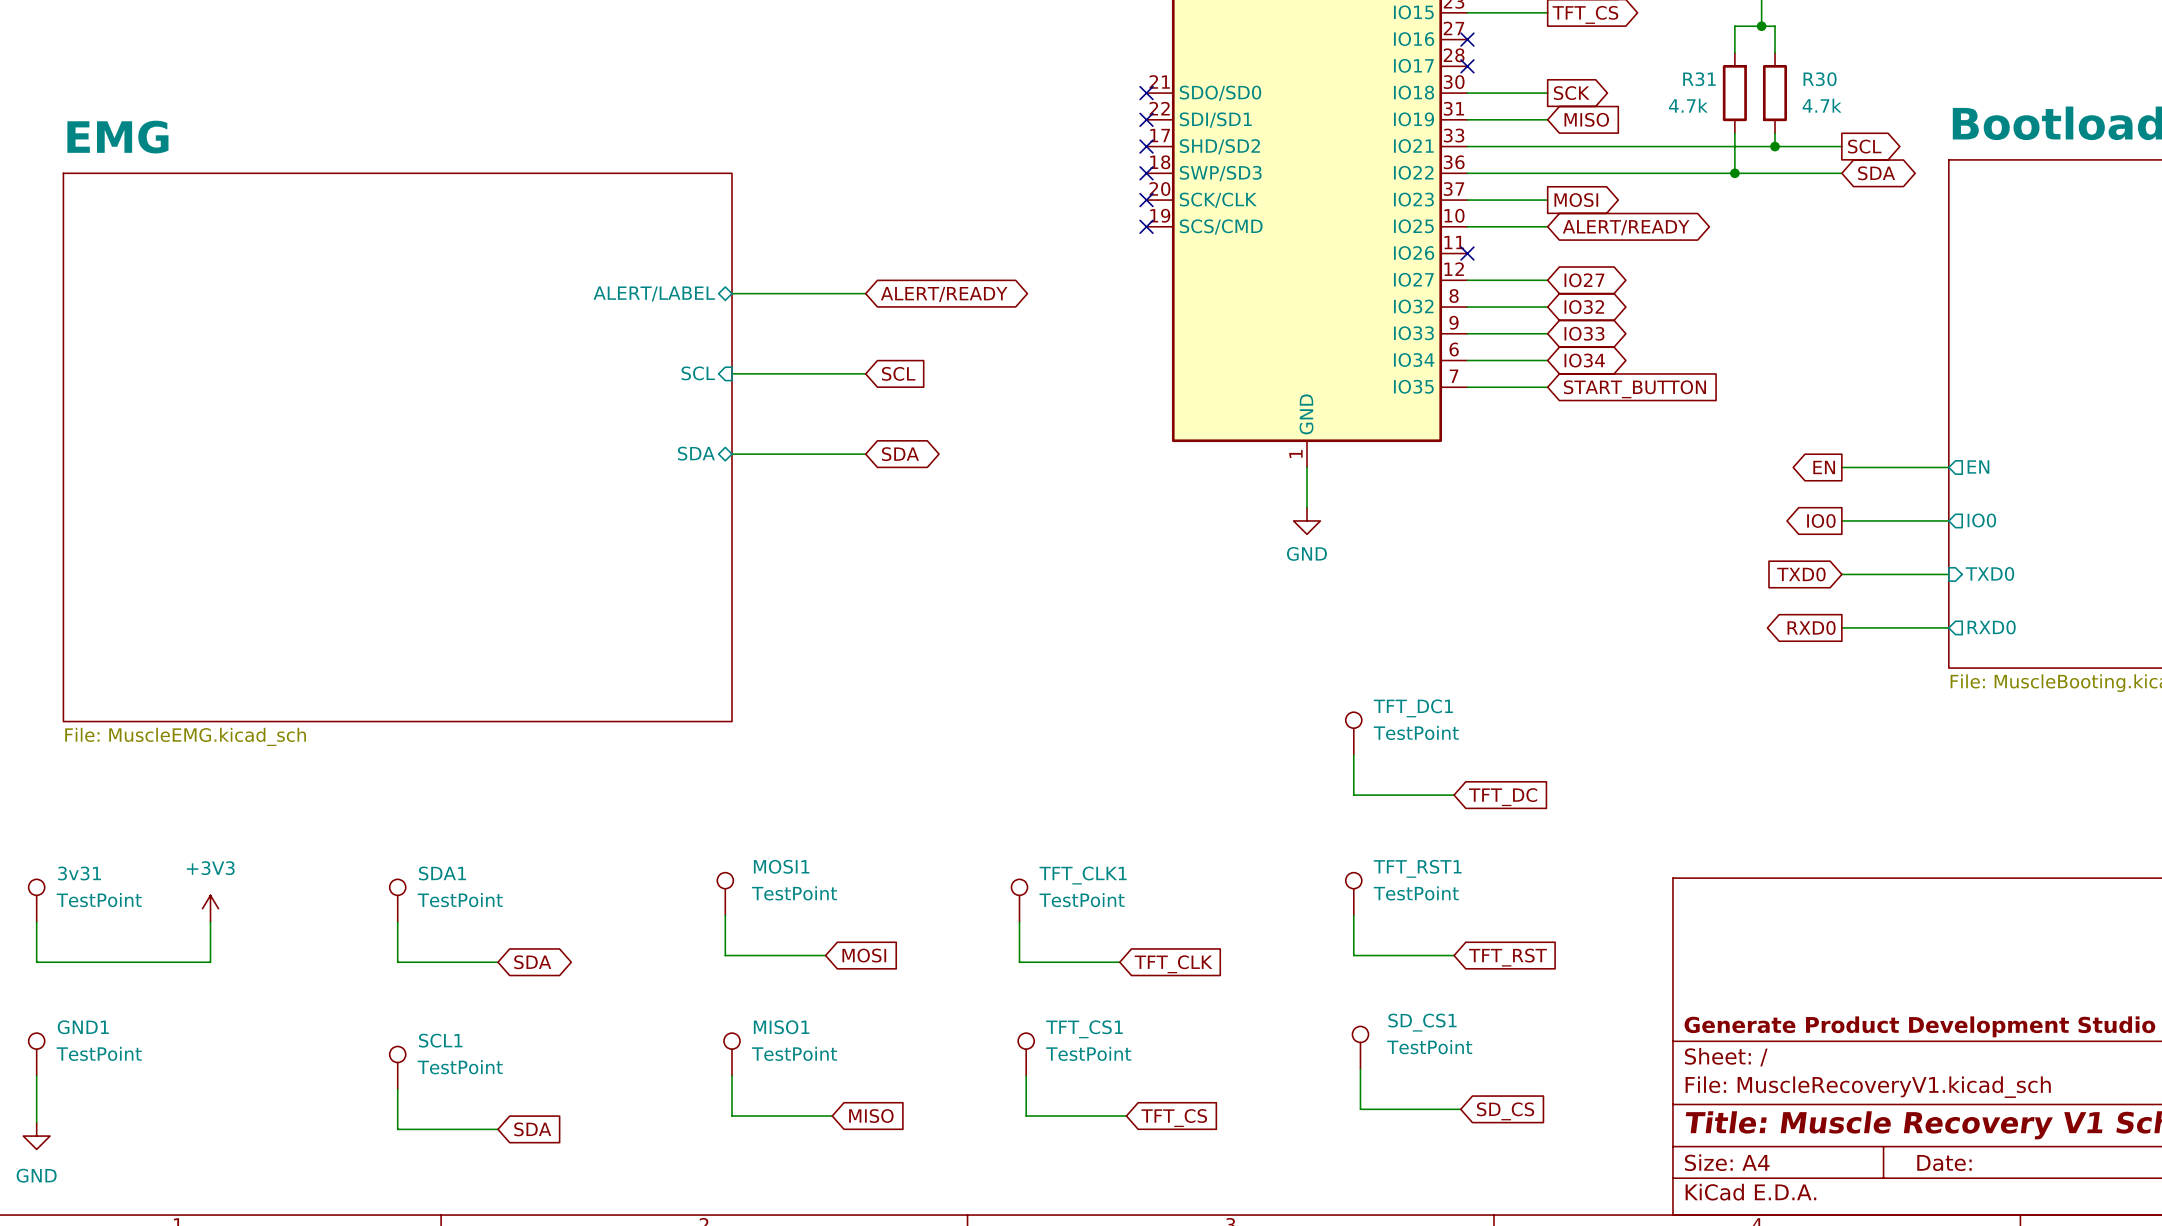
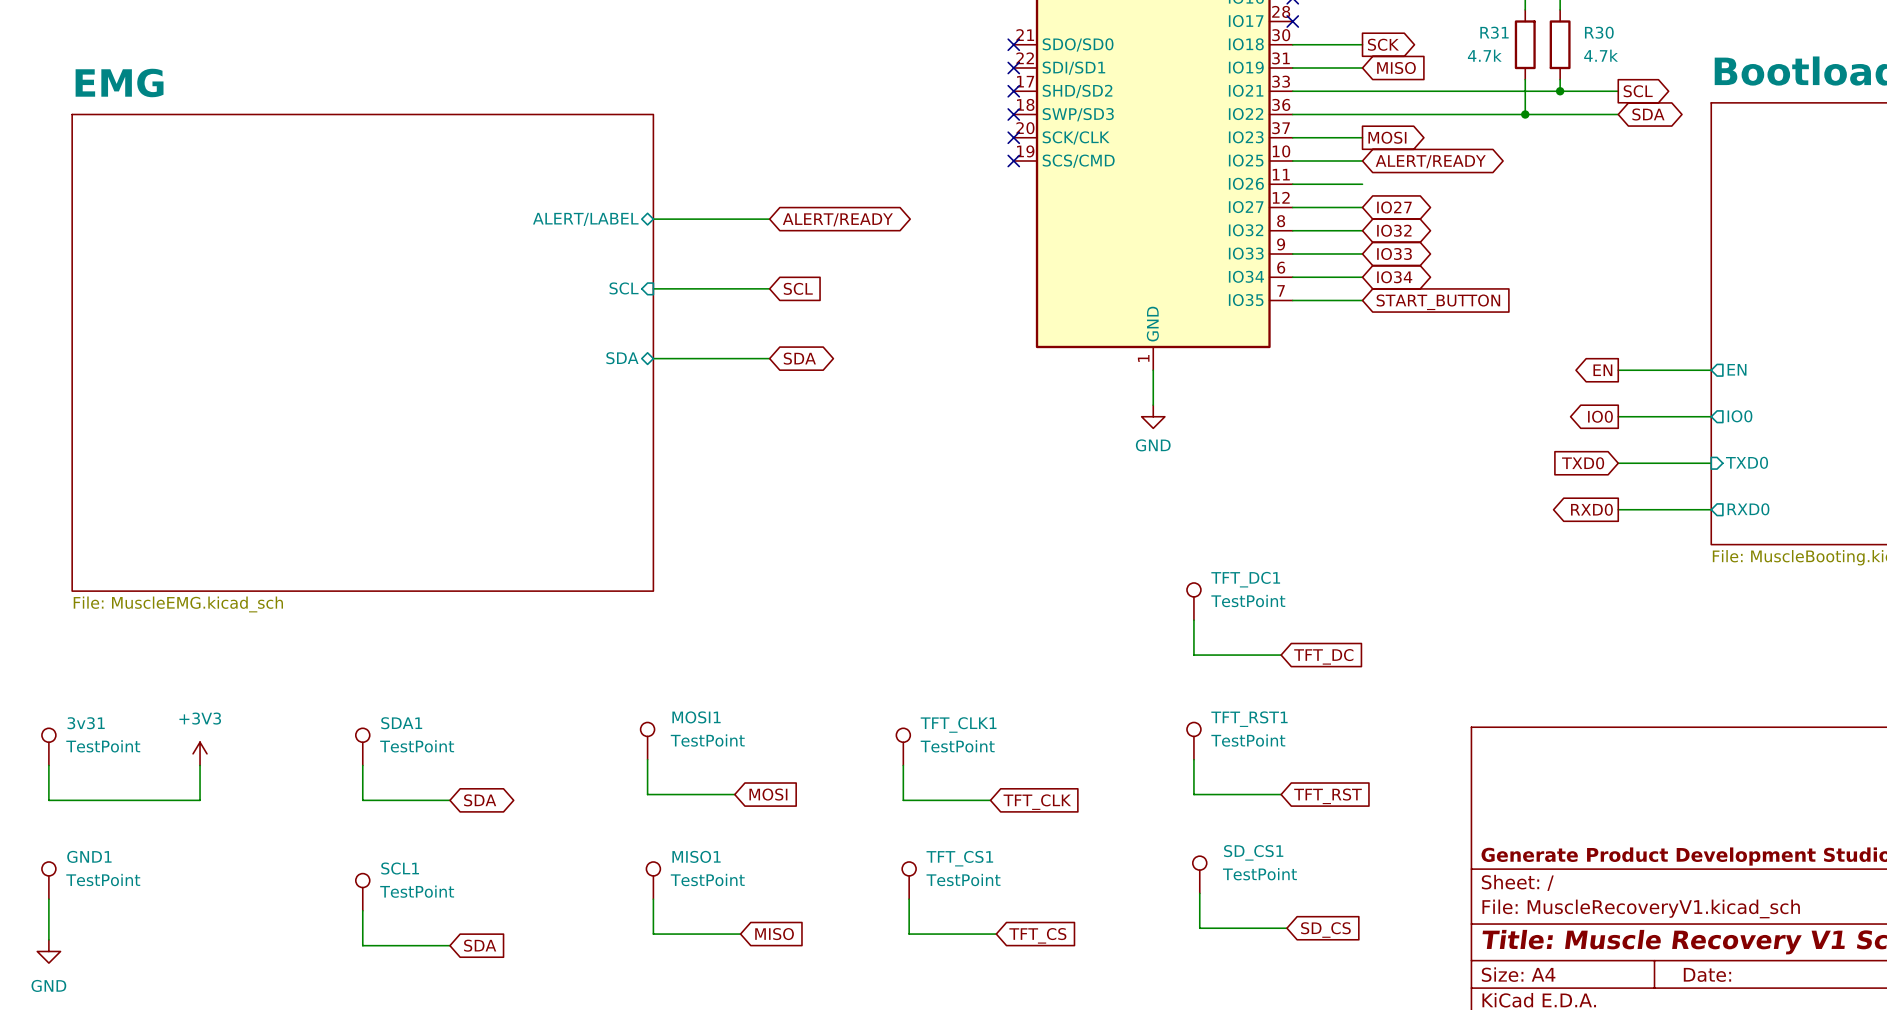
wire: none -> (1292, 184) (1362, 184)
no-connect mark: (1467, 253) -> none

